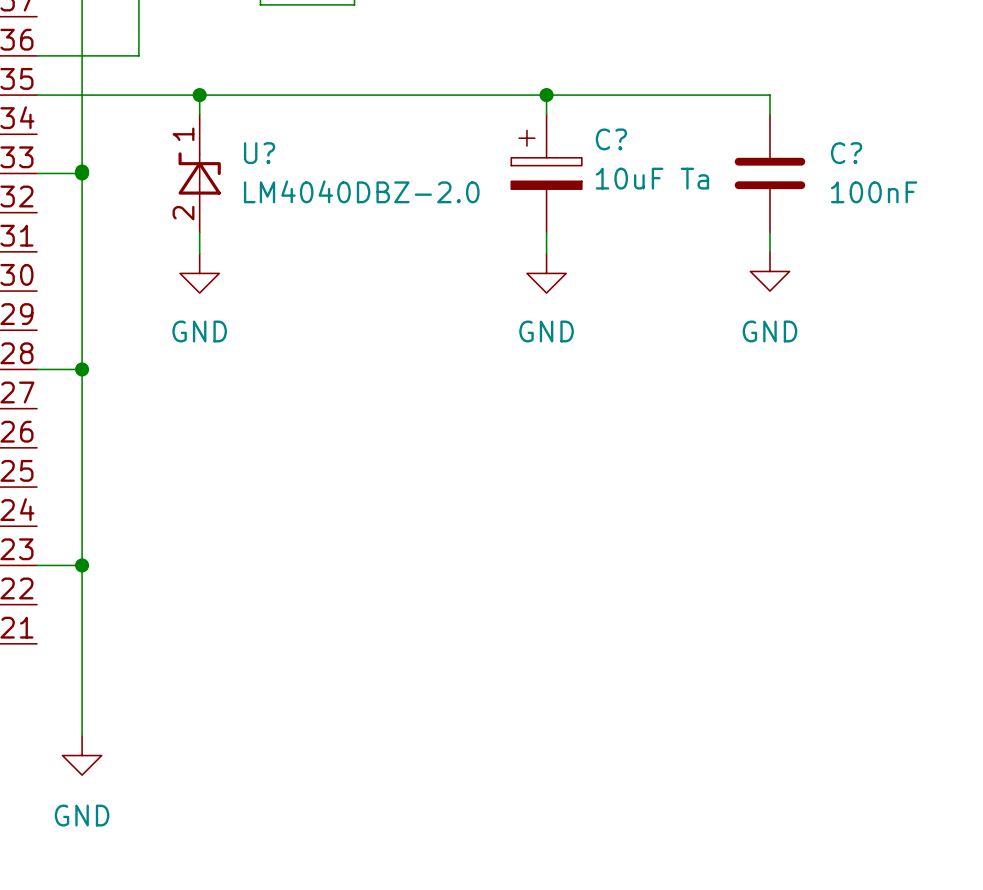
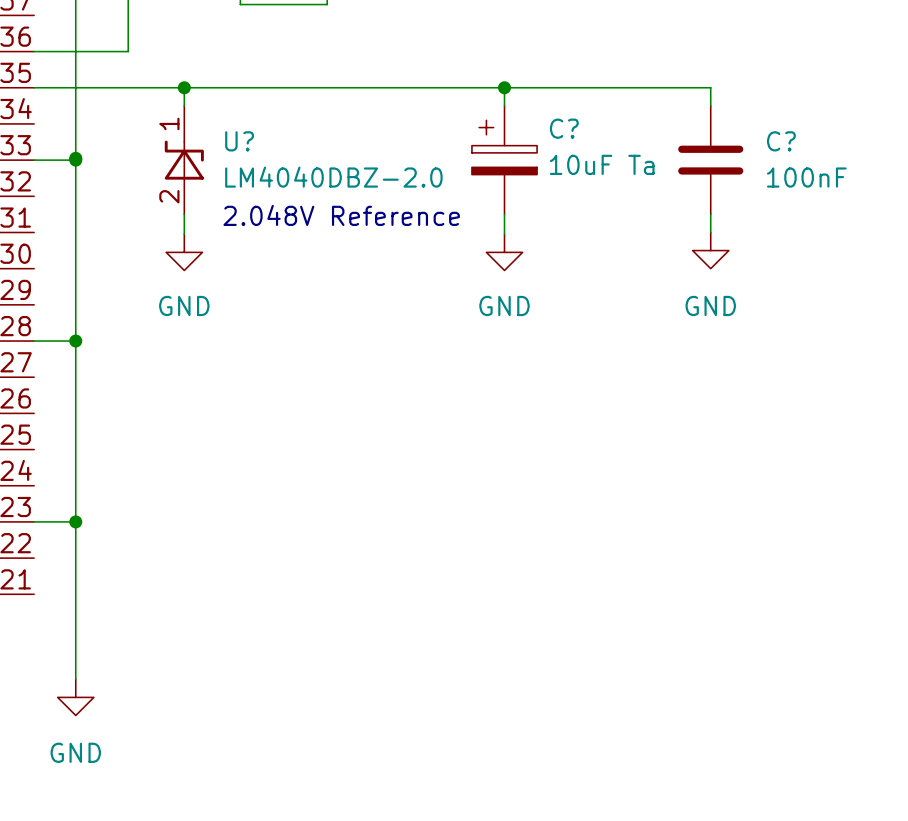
text: none -> 2.048V Reference (341, 215)

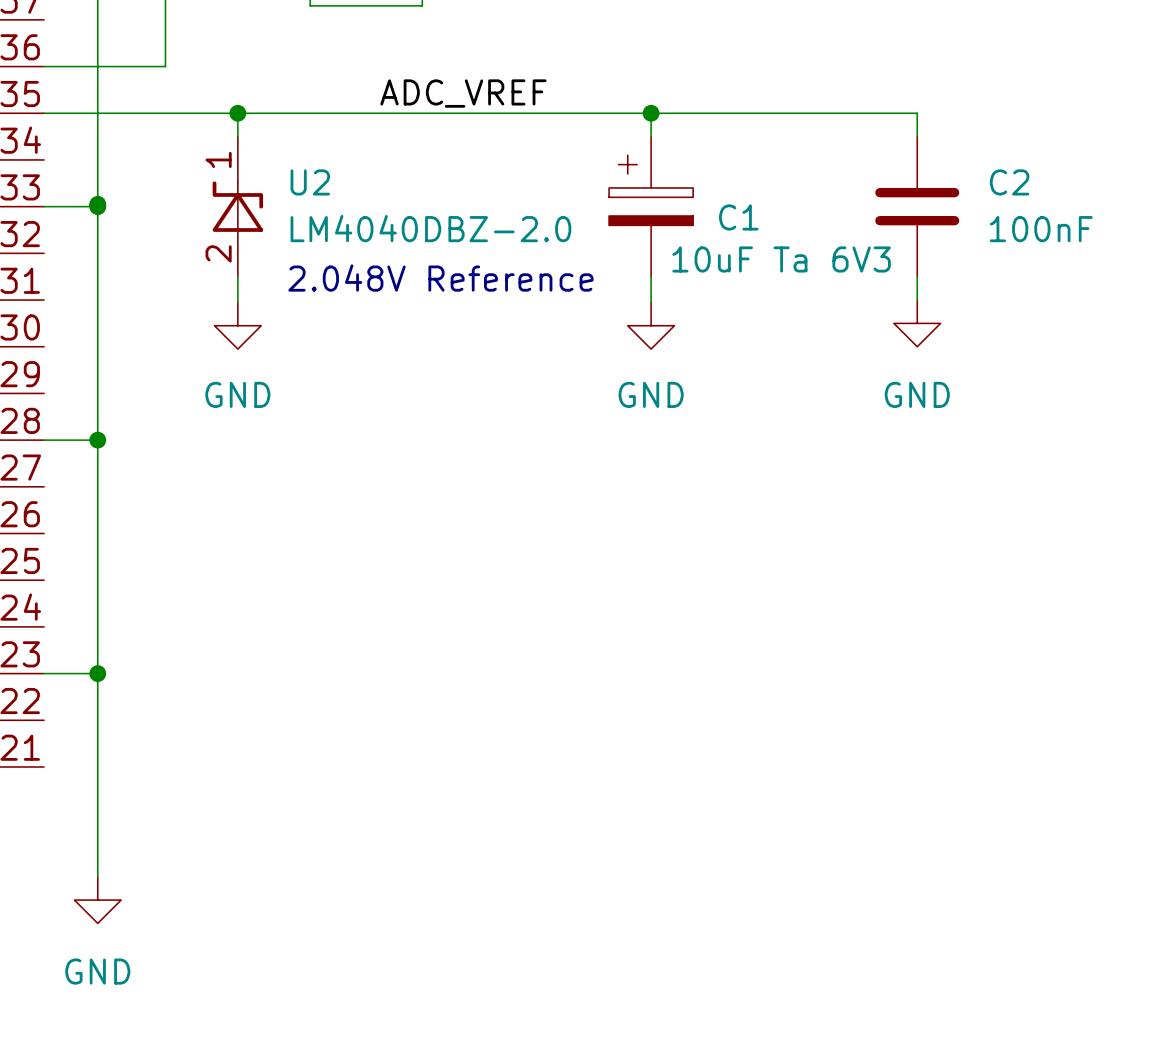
label: none -> ADC_VREF (463, 93)
C? name: C? (564, 128) -> C1 (738, 217)
U? name: U? (239, 141) -> U2 (310, 182)
C? name: C? (781, 141) -> C2 (1009, 182)
C? value: 10uF Ta (602, 164) -> 10uF Ta 6V3 (781, 259)

